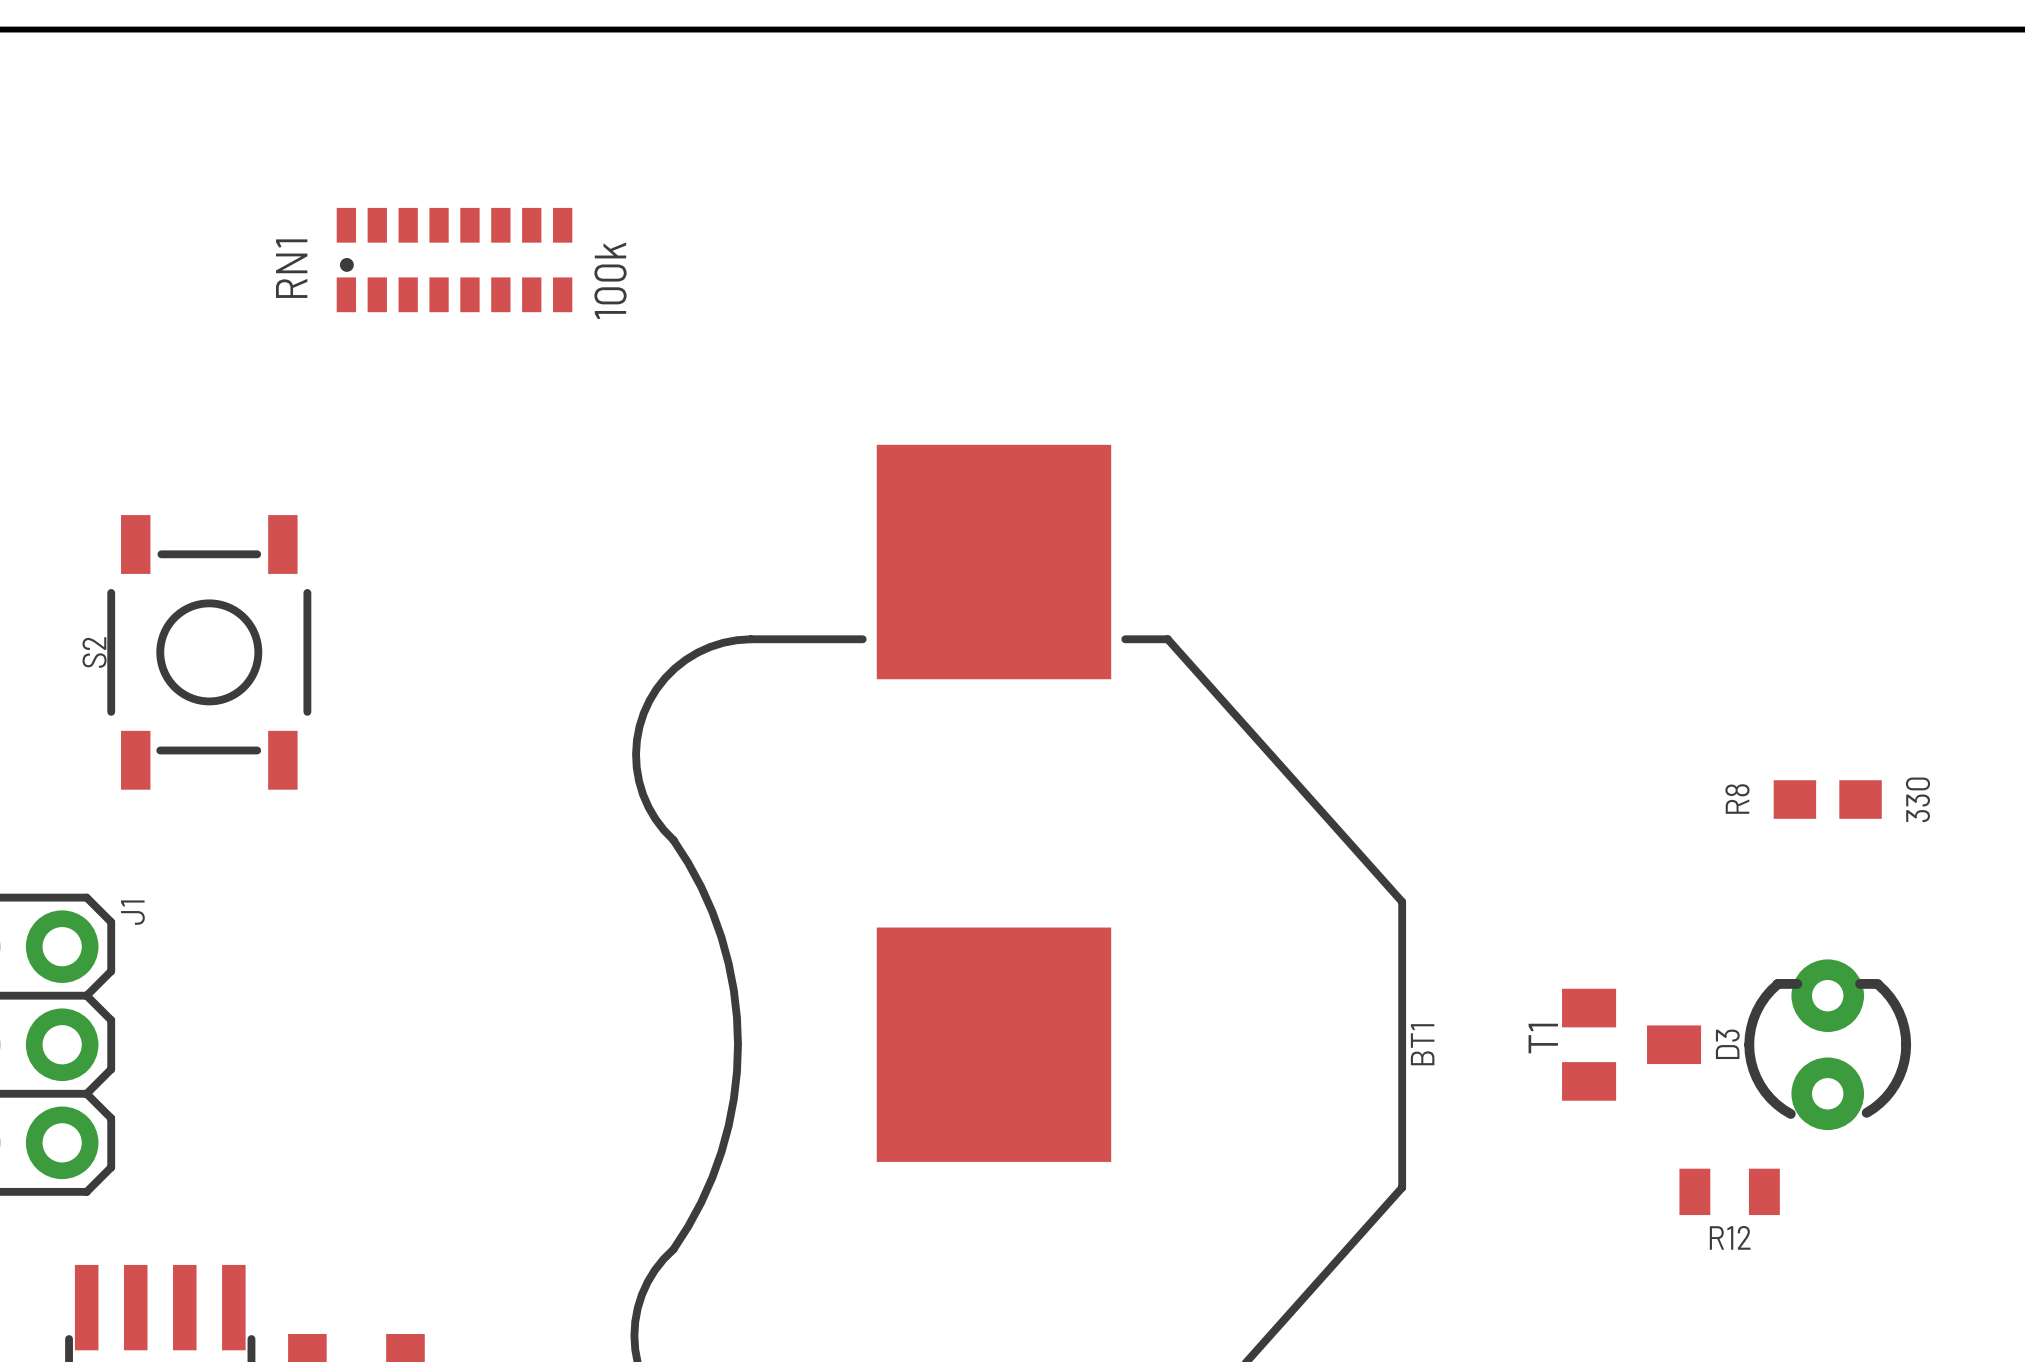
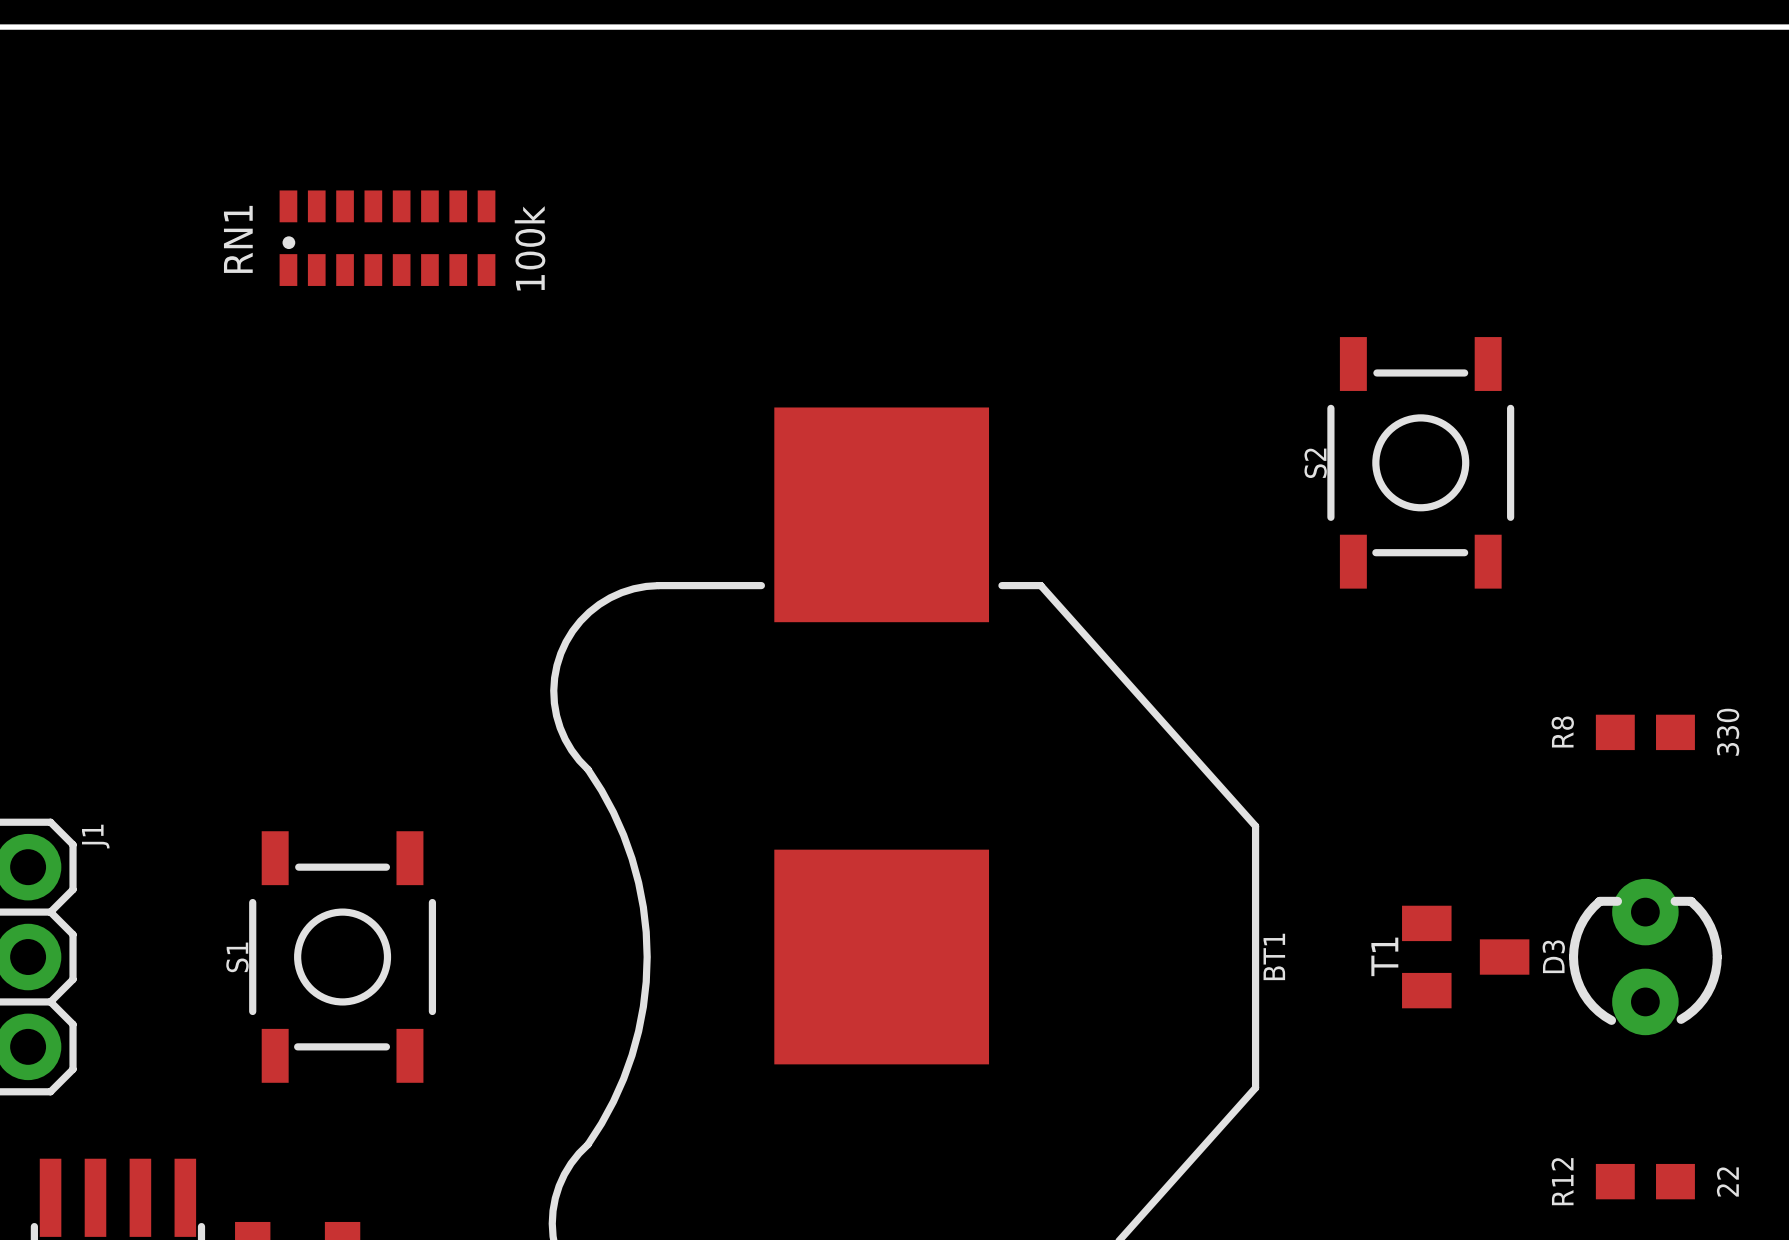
S2 position: (209, 652) -> (1420, 462)
S1: none -> (342, 957)
R12 footprint: [1679, 1168, 1780, 1216] -> [1595, 1163, 1695, 1200]
R12 name position: R12 (1730, 1237) -> R12 (1562, 1181)
R12 value: none -> 22 (1727, 1181)

